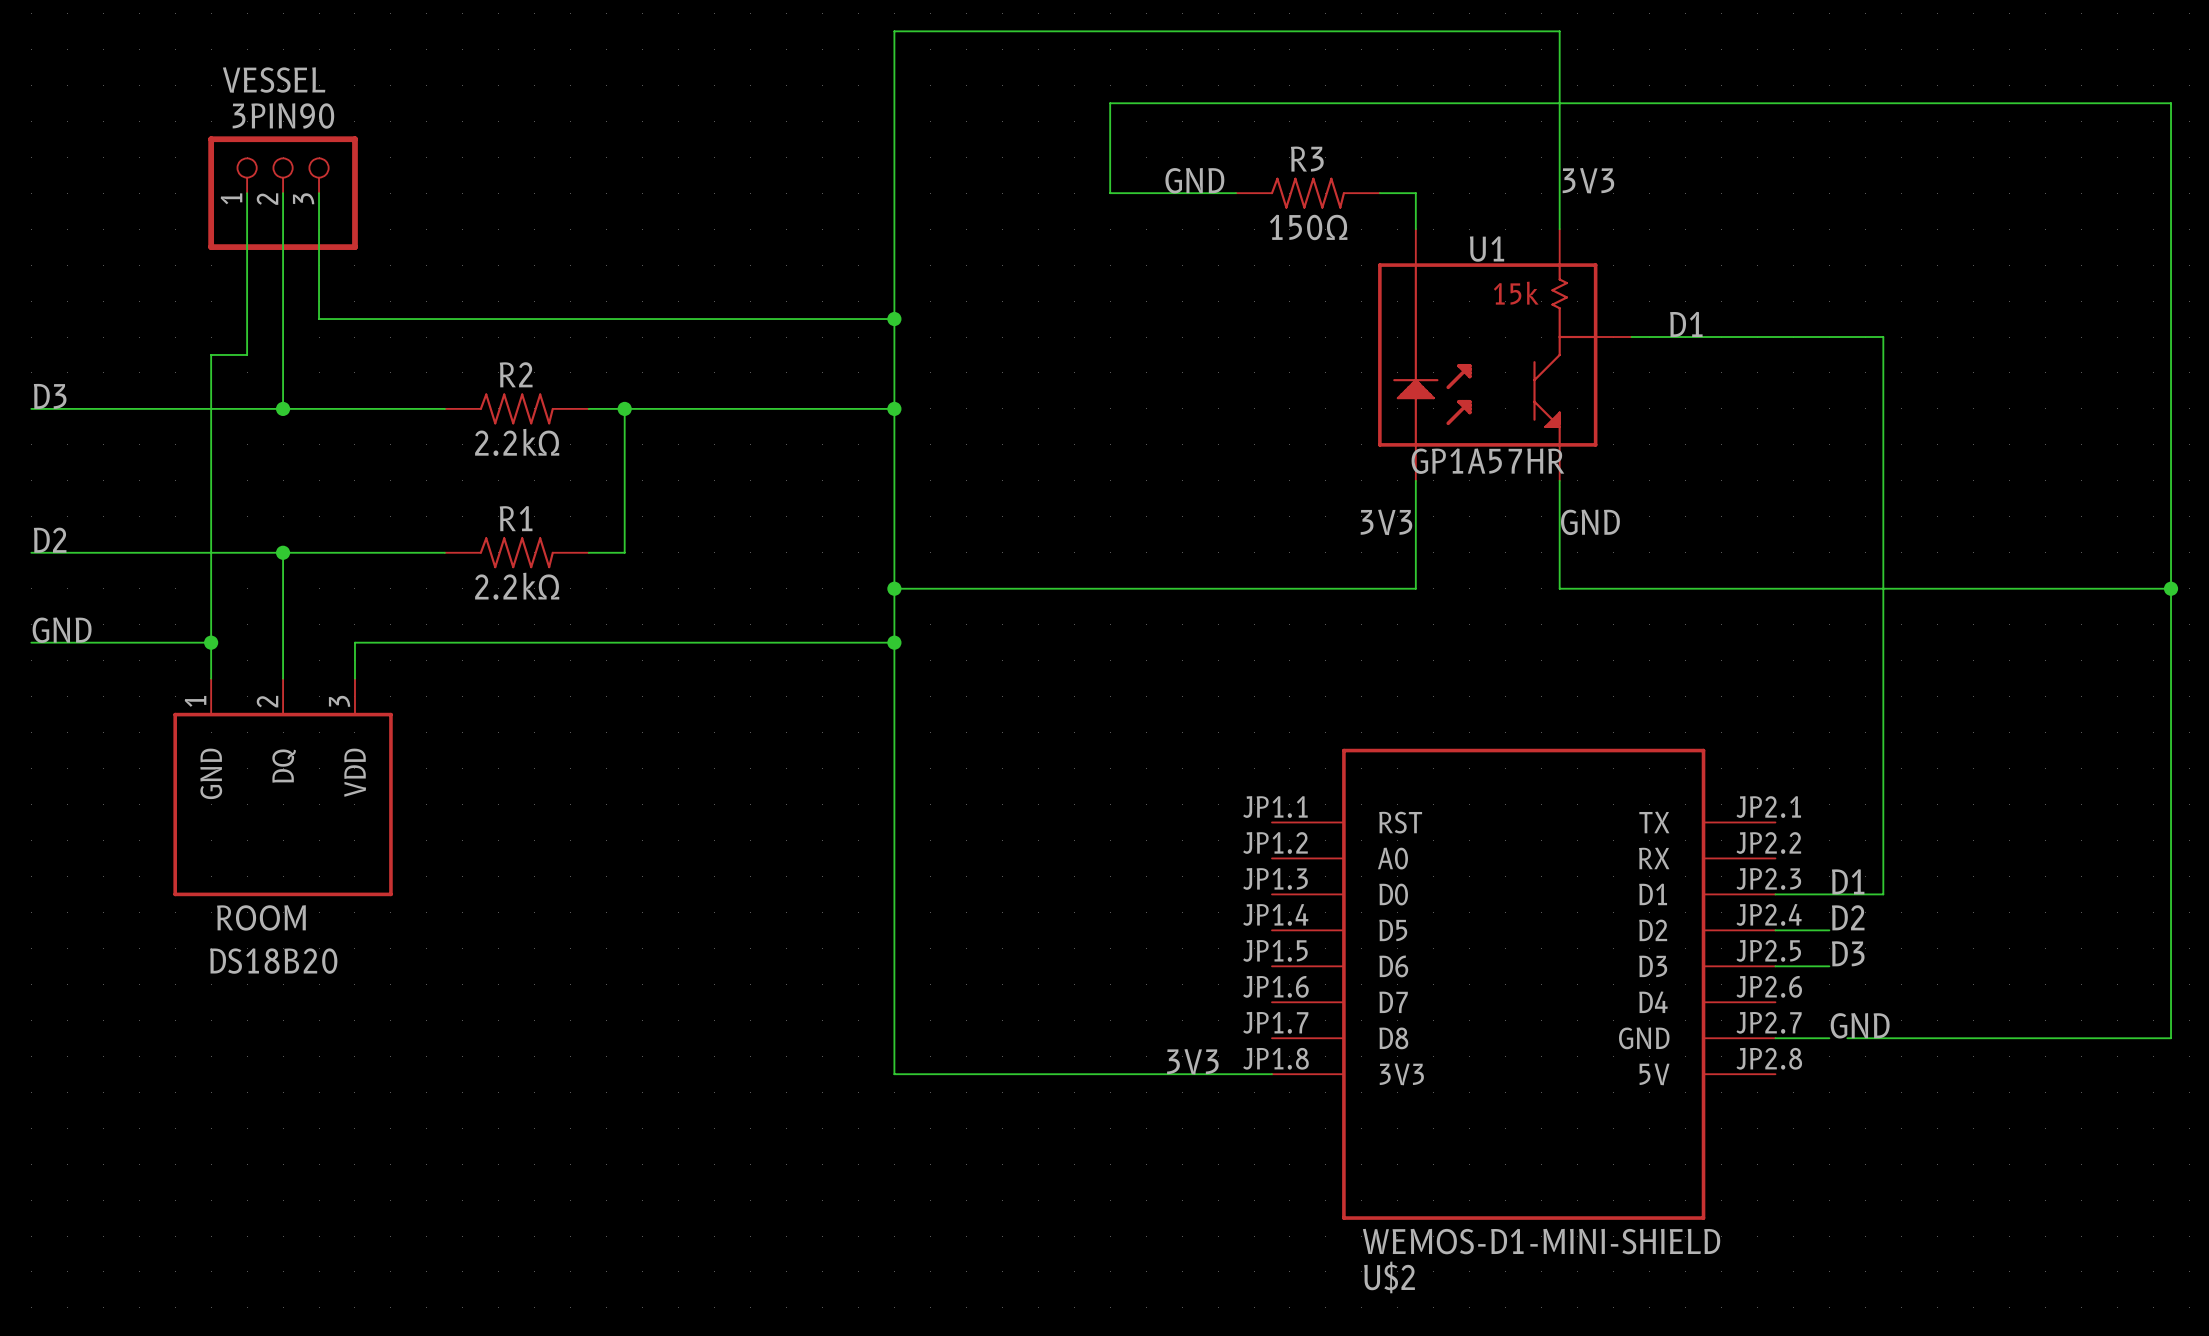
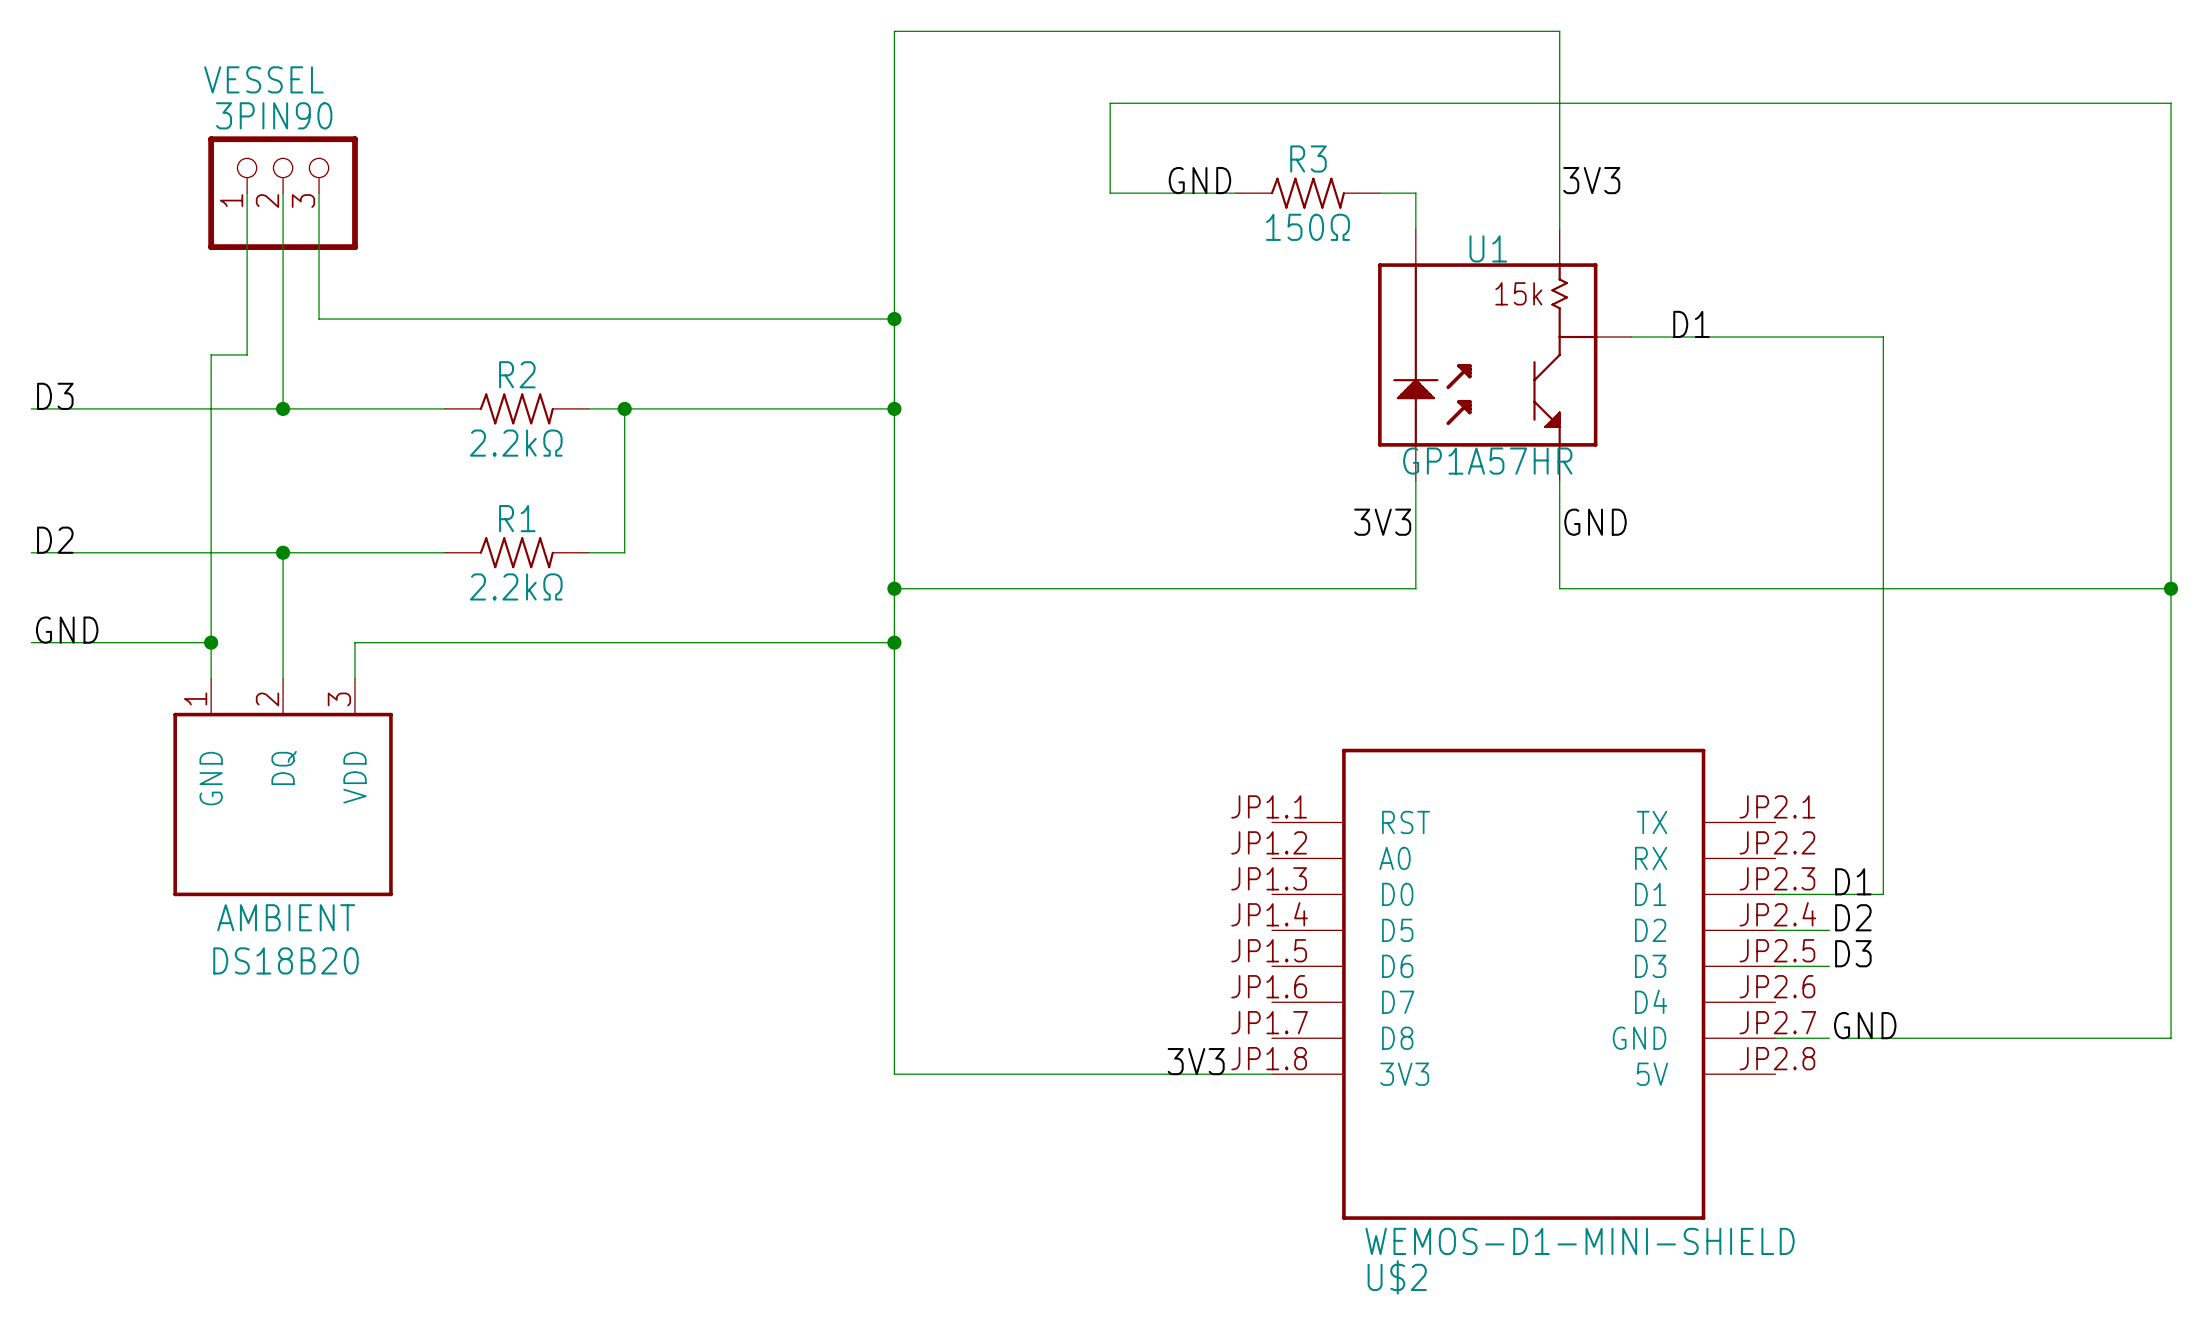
ROOM name: ROOM (261, 917) -> AMBIENT (286, 917)

